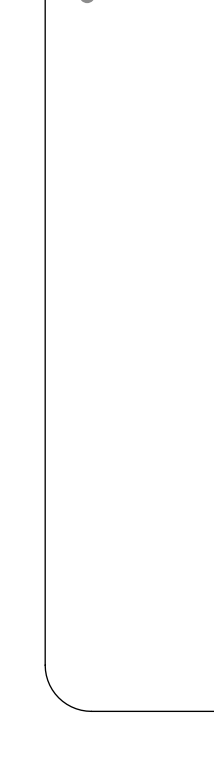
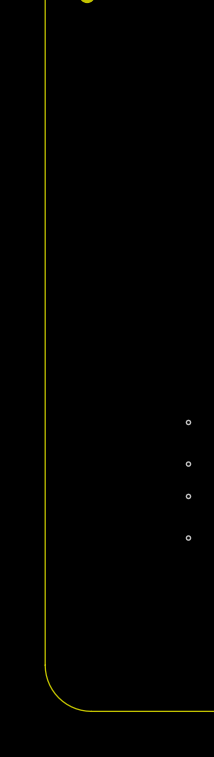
via: none -> (188, 422)
via: none -> (188, 464)
via: none -> (188, 496)
via: none -> (188, 538)

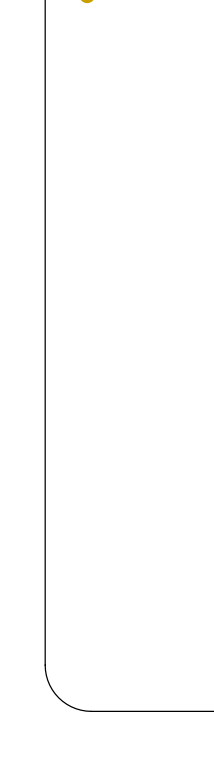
via: (188, 422) -> none
via: (188, 464) -> none
via: (188, 496) -> none
via: (188, 538) -> none

